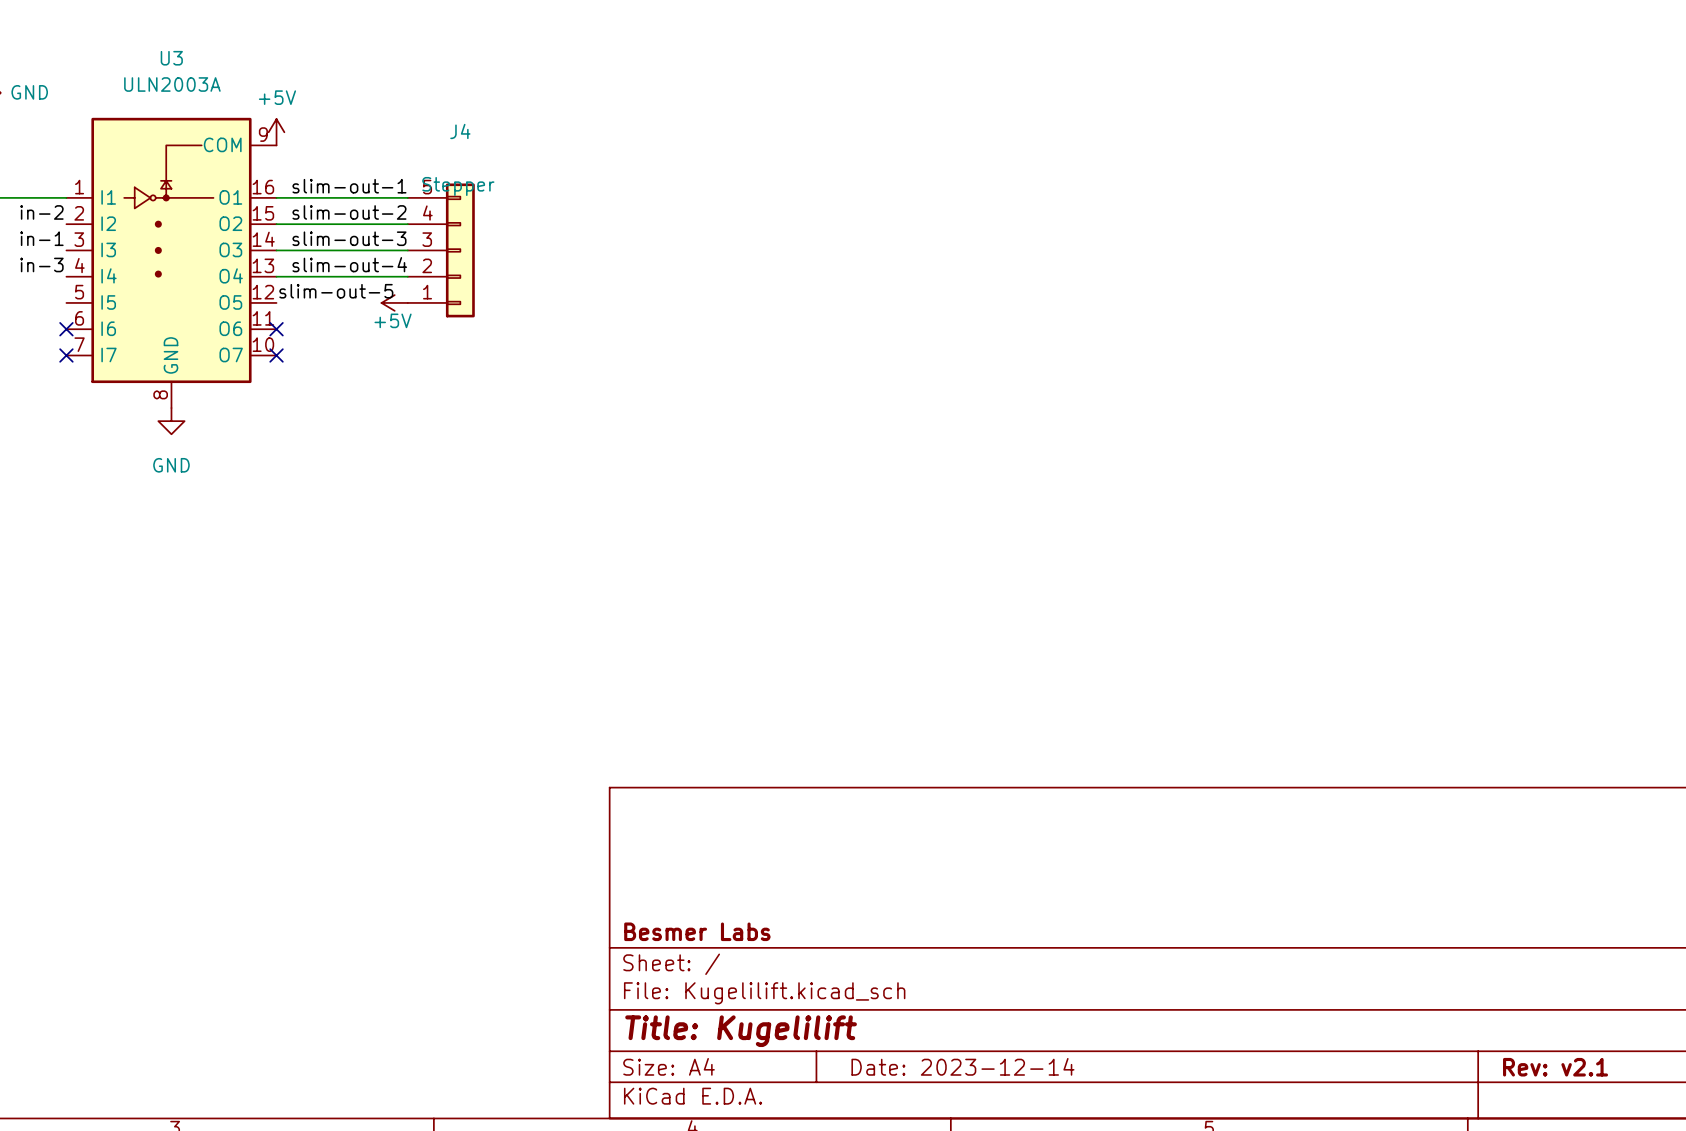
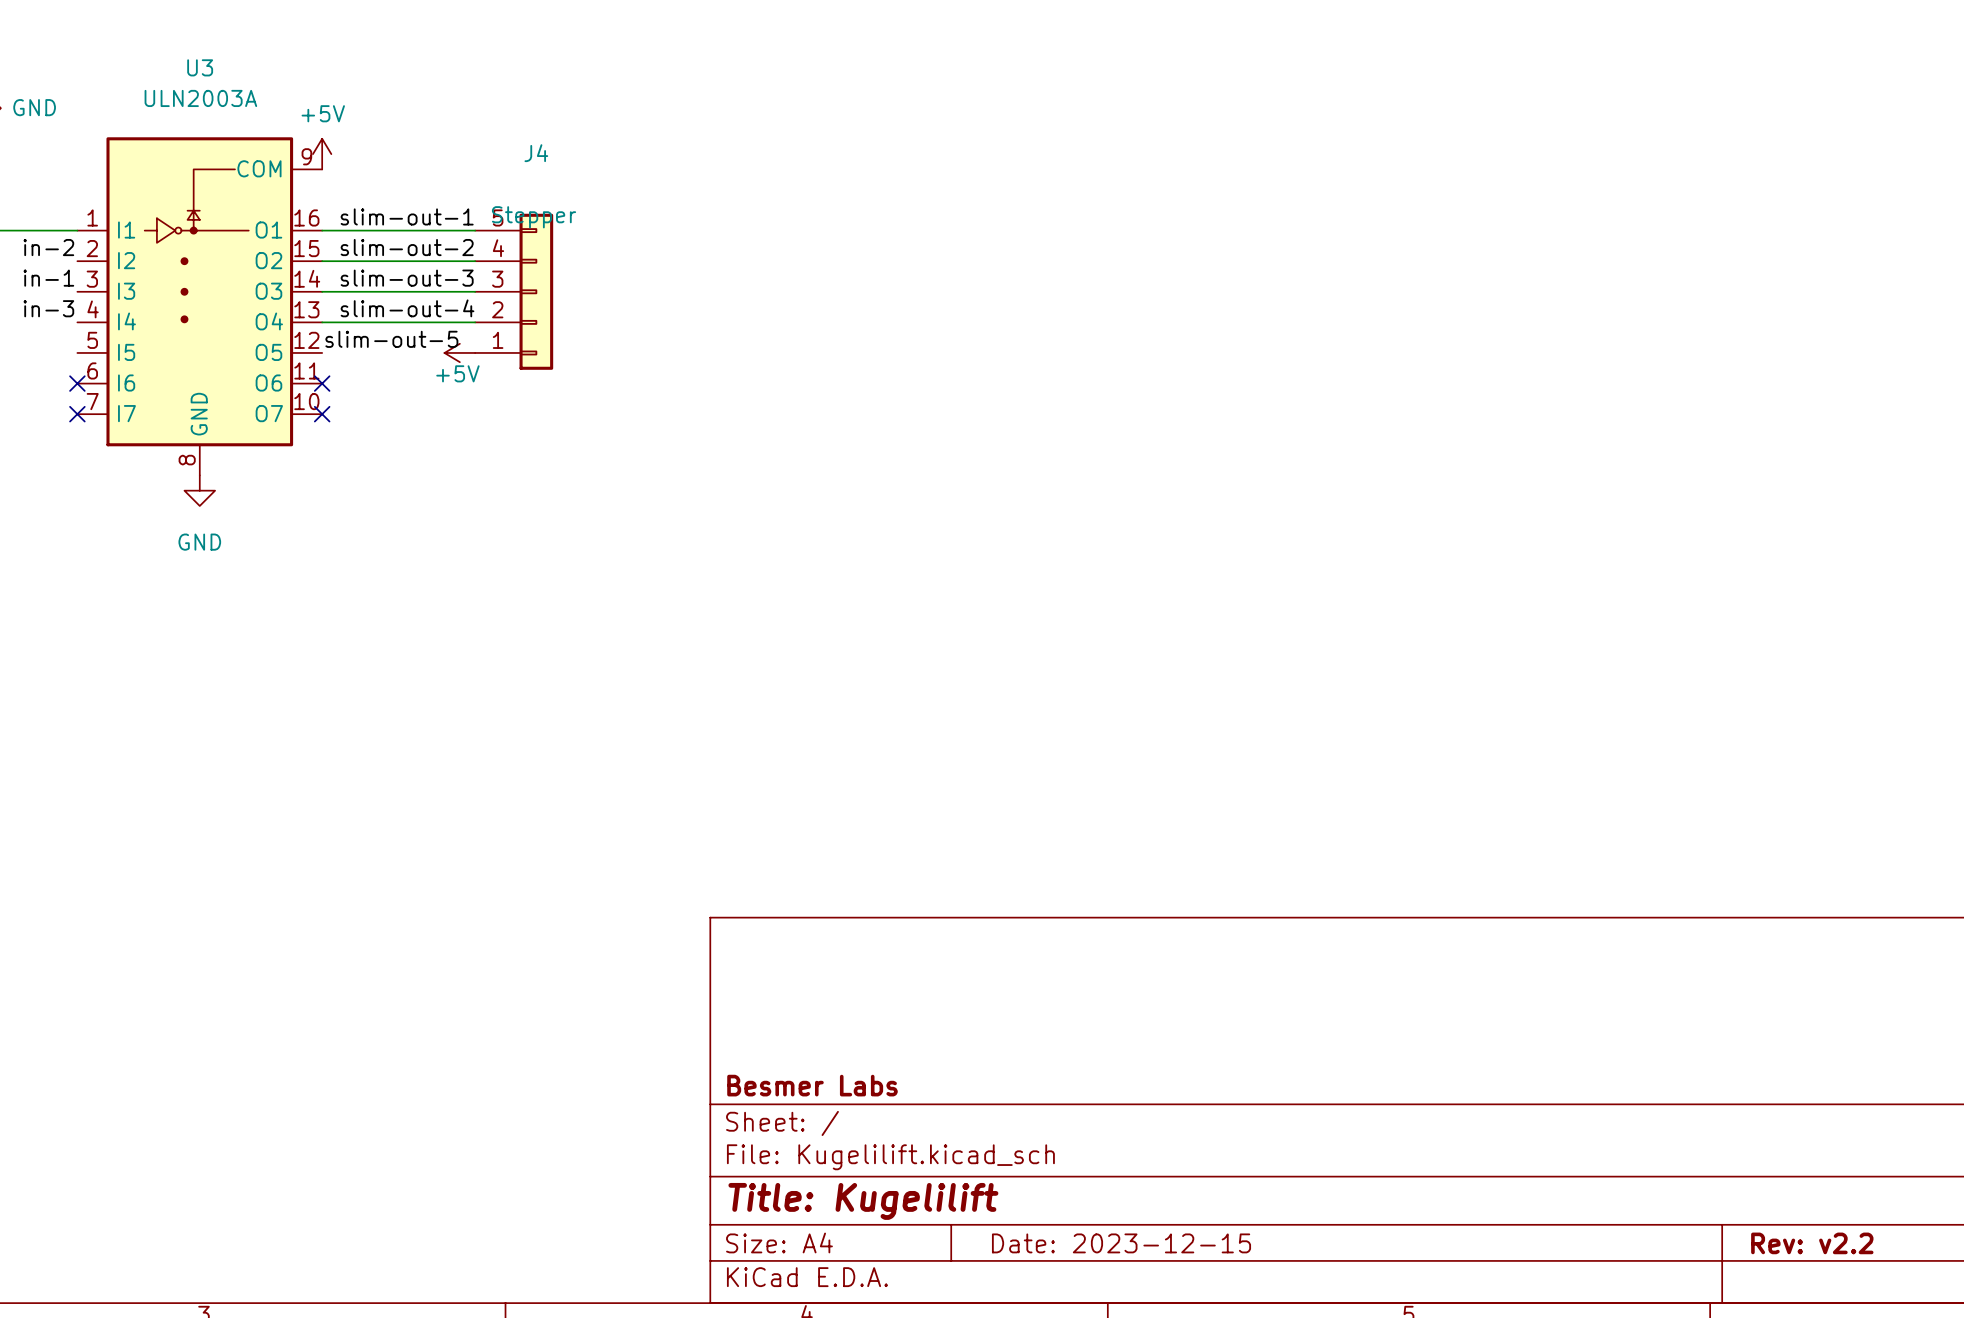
title block: Date: 2023-12-14 (962, 1066) -> Date: 2023-12-15 (1121, 1243)
title block: Rev: v2.1 (1555, 1067) -> Rev: v2.2 (1812, 1243)

